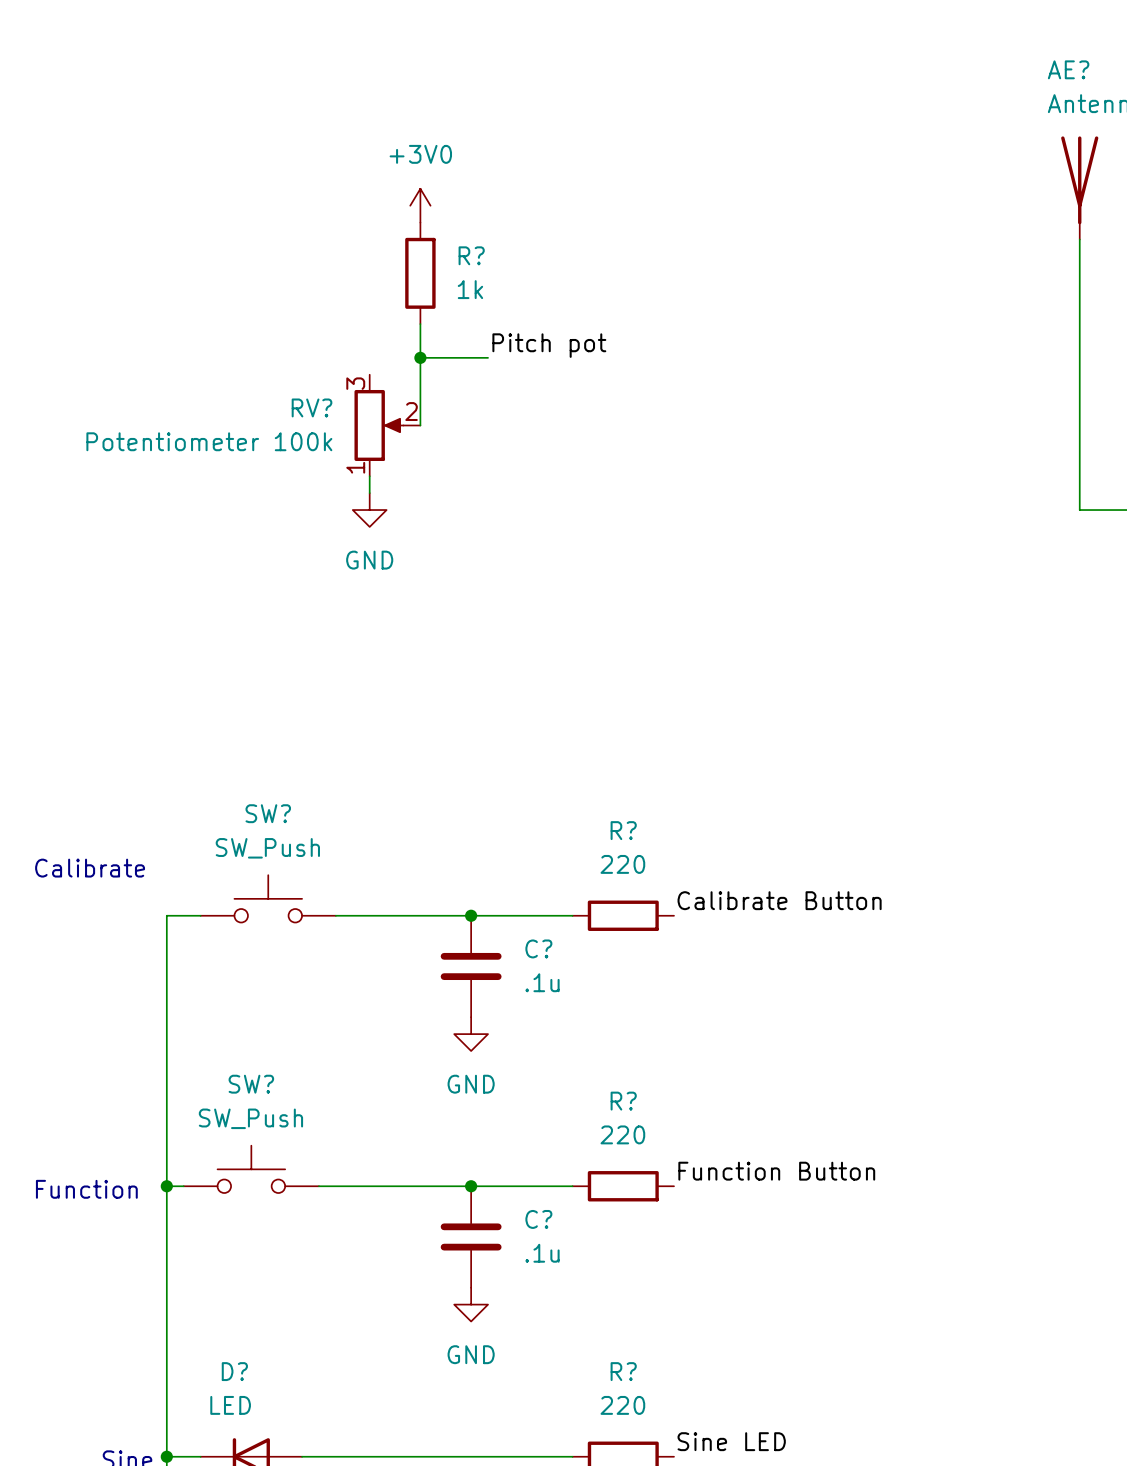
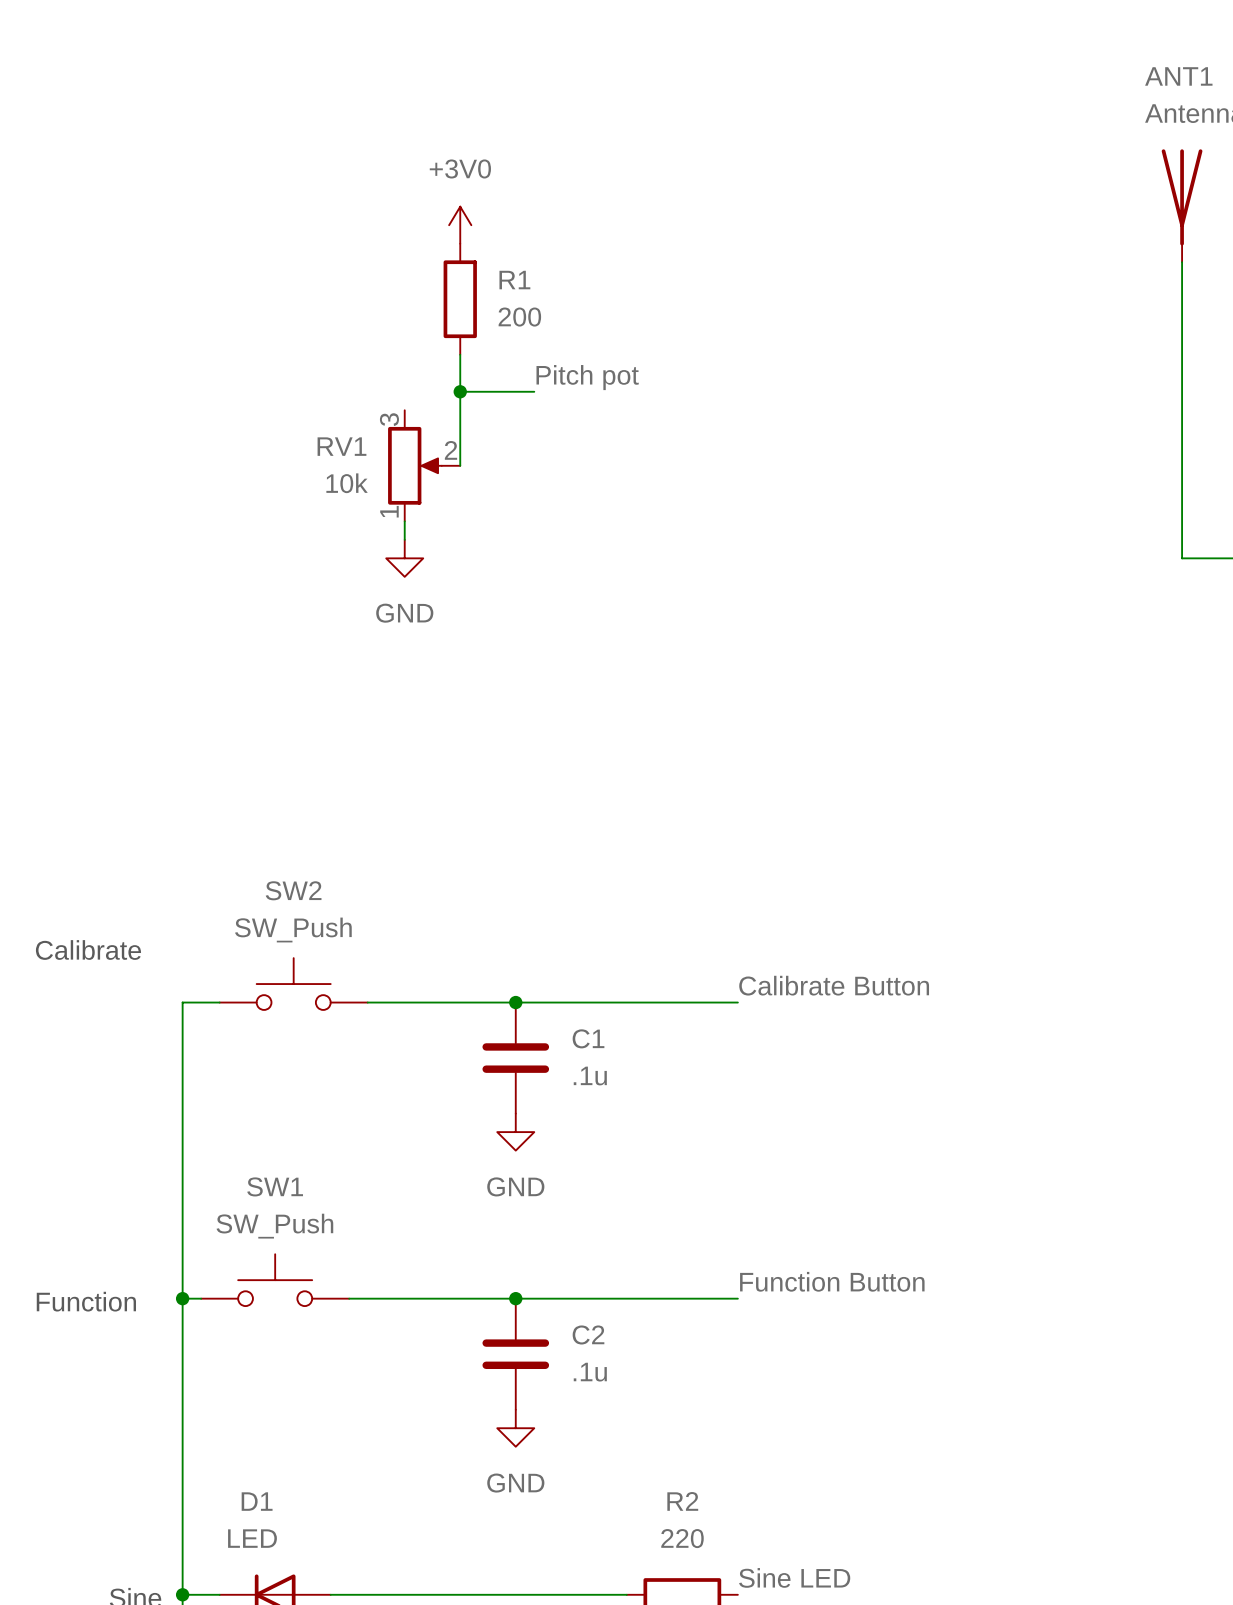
AE? name: AE? (1068, 69) -> ANT1 (1178, 76)
R? name: R? (471, 255) -> R1 (514, 280)
R? value: 1k (470, 289) -> 200 (519, 317)
RV? name: RV? (312, 407) -> RV1 (341, 446)
RV? value: Potentiometer 100k (209, 441) -> 10k (347, 483)
SW? name: SW? (268, 813) -> SW2 (293, 890)
wire: none -> (626, 1002) (737, 1002)
R?: 220 (623, 915) -> none
C? name: C? (538, 948) -> C1 (588, 1038)
SW? name: SW? (251, 1084) -> SW1 (275, 1186)
wire: none -> (626, 1298) (737, 1298)
R?: 220 (623, 1186) -> none
C? name: C? (538, 1219) -> C2 (588, 1334)
D? name: D? (234, 1371) -> D1 (257, 1501)
R? name: R? (623, 1371) -> R2 (682, 1501)

